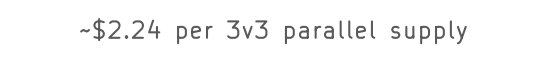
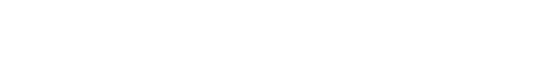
text: ~$2.24 per 3v3 parallel supply (273, 31) -> none

